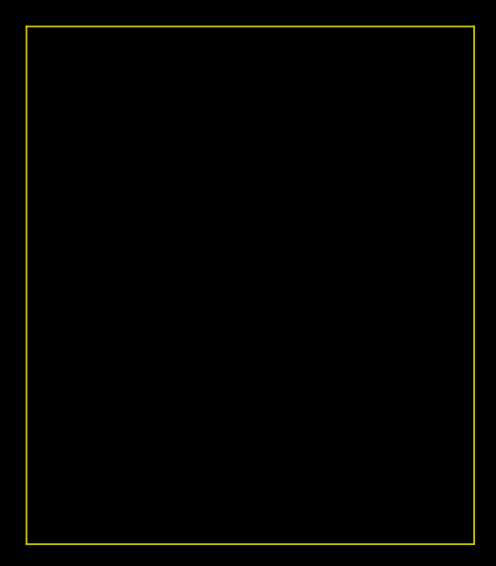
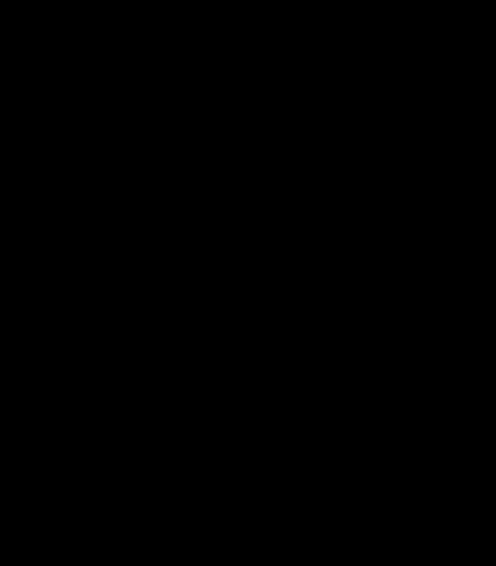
board edge: (26, 26) (26, 544) (474, 544) (474, 26) (26, 26) -> none

